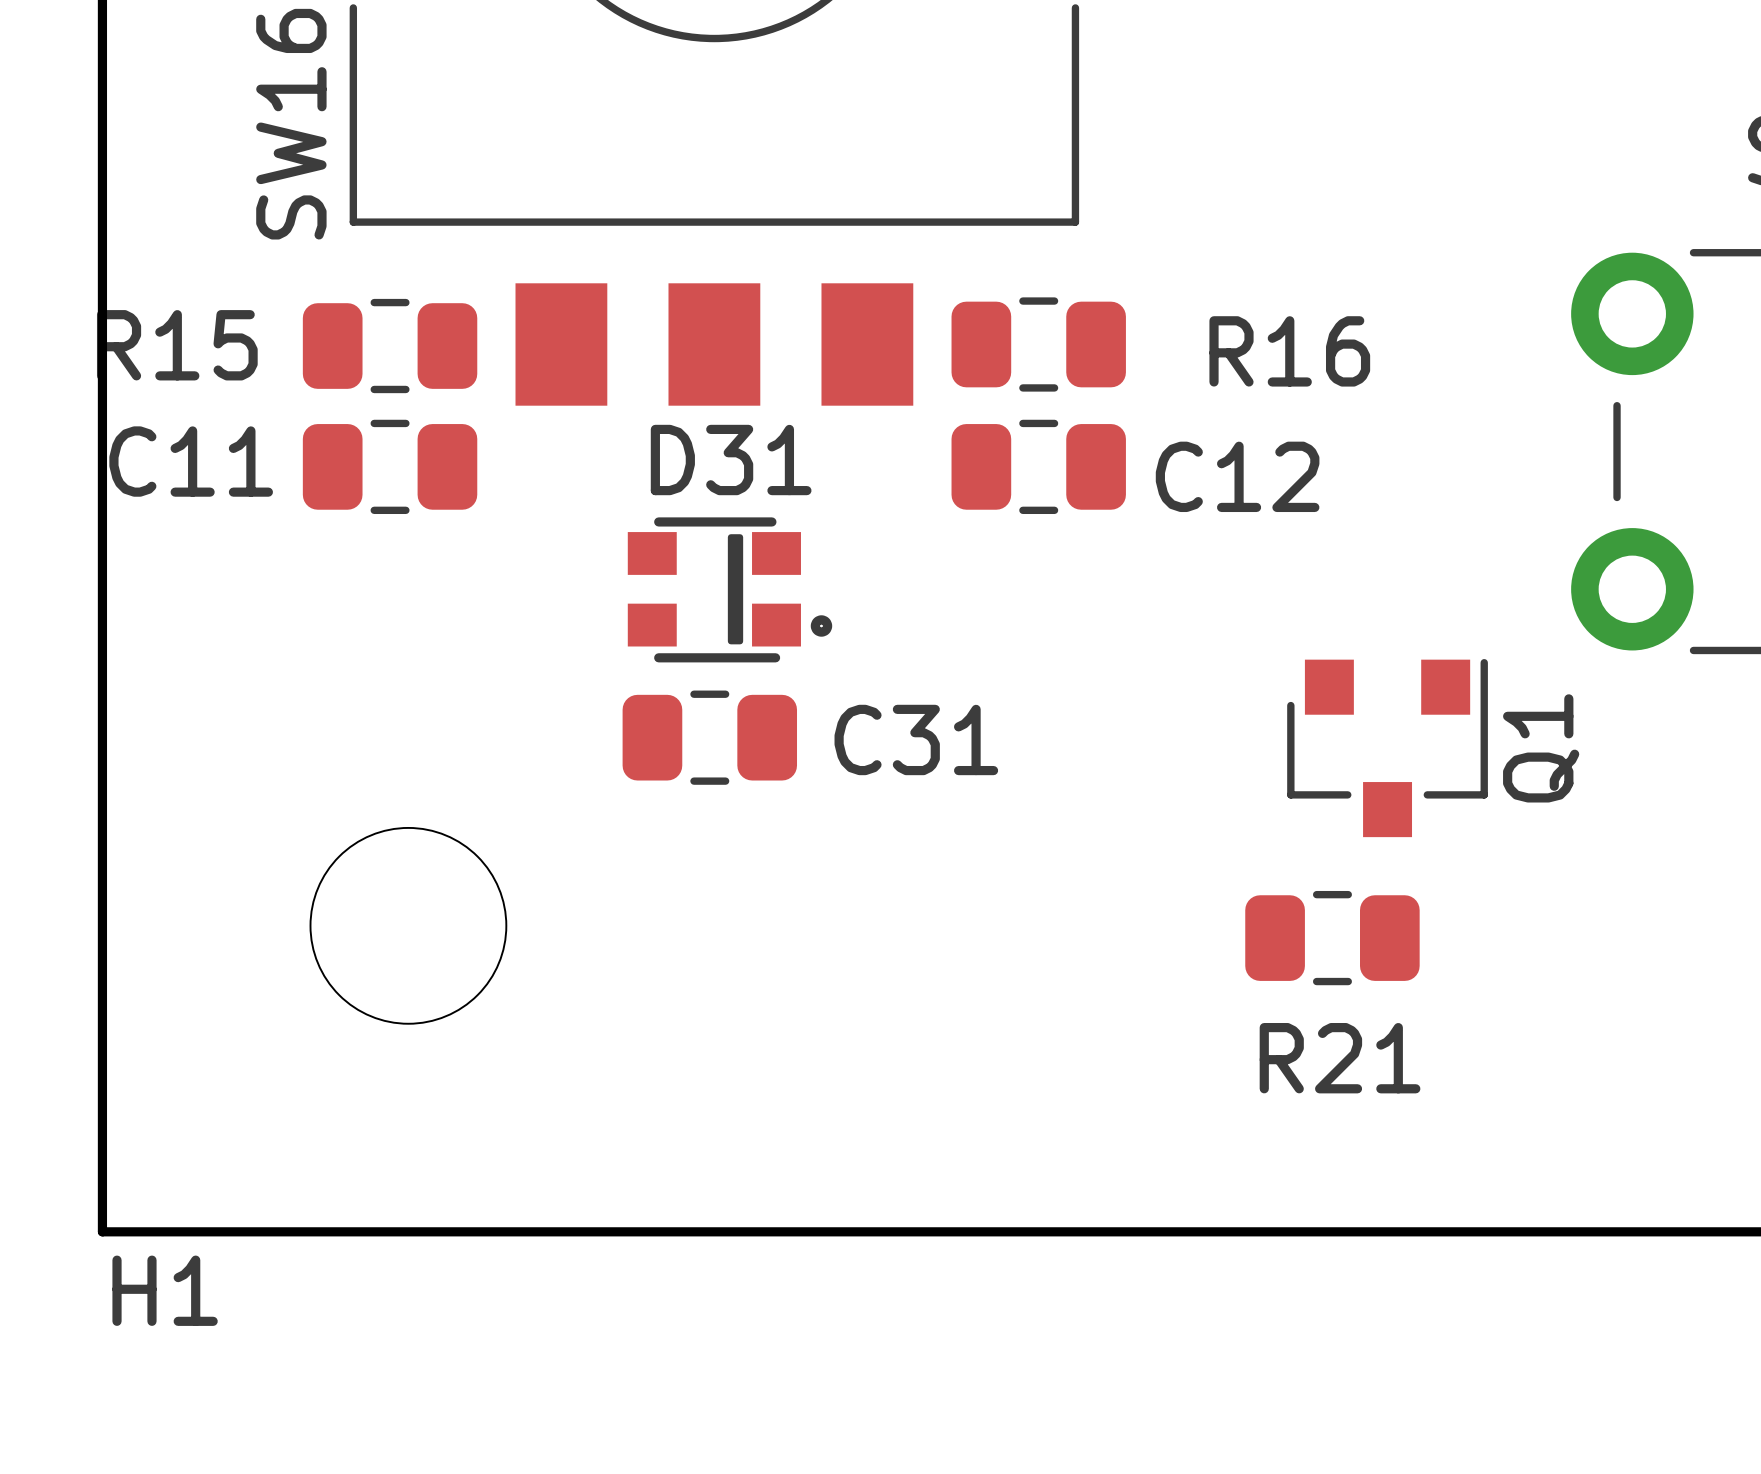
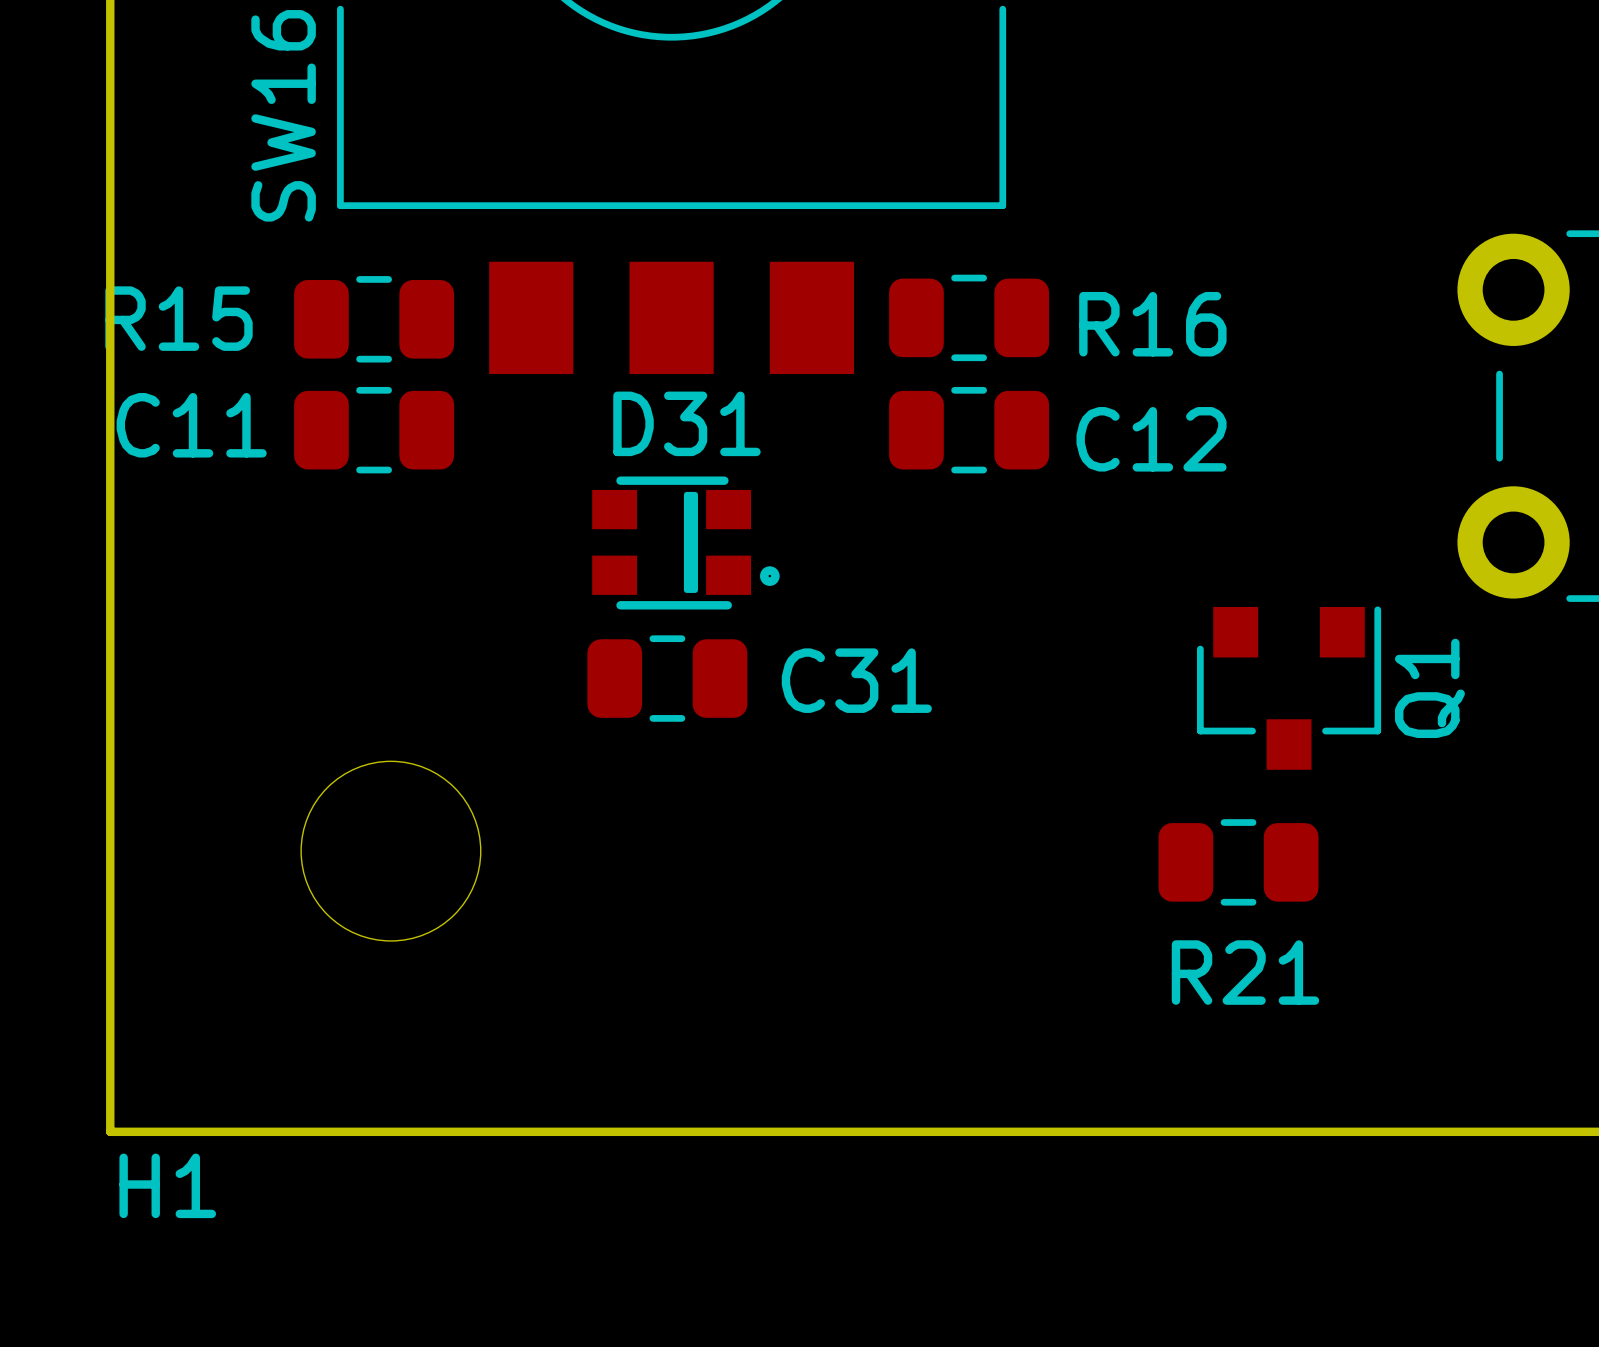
R16 name position: R16 (1289, 351) -> R16 (1152, 324)

